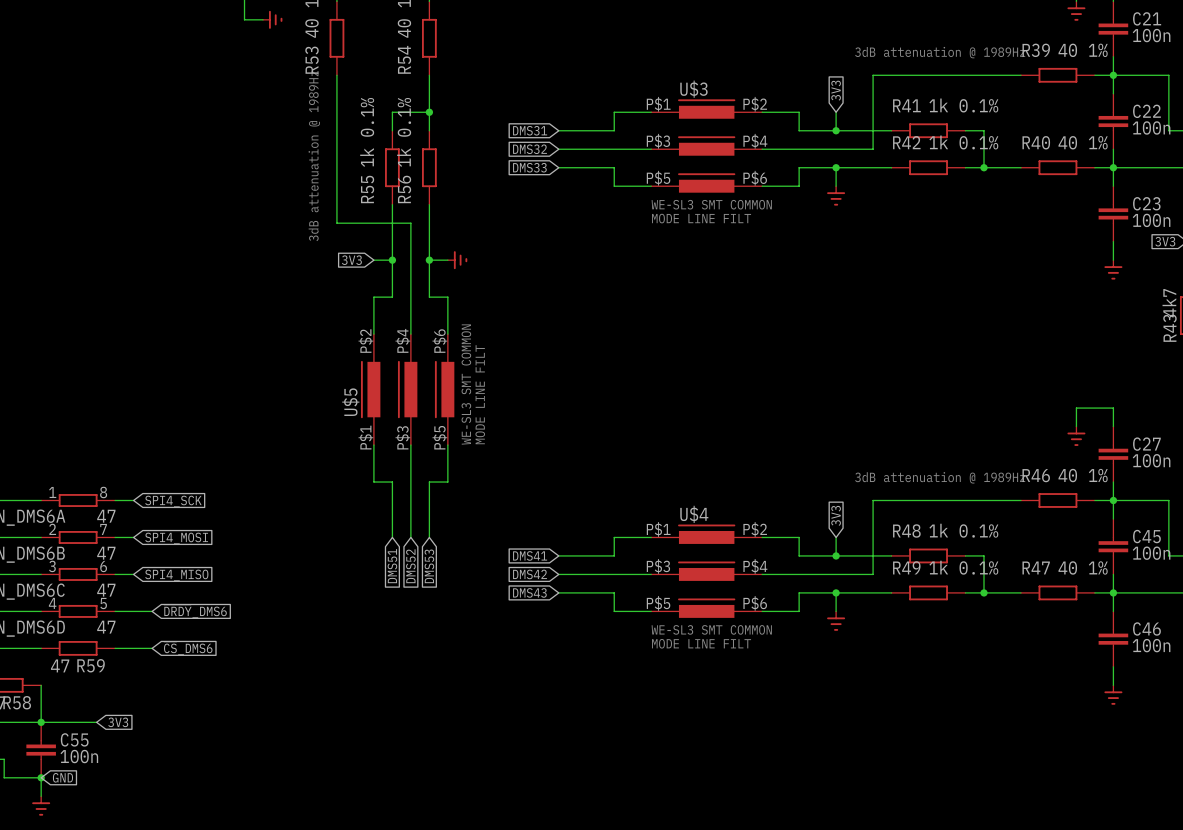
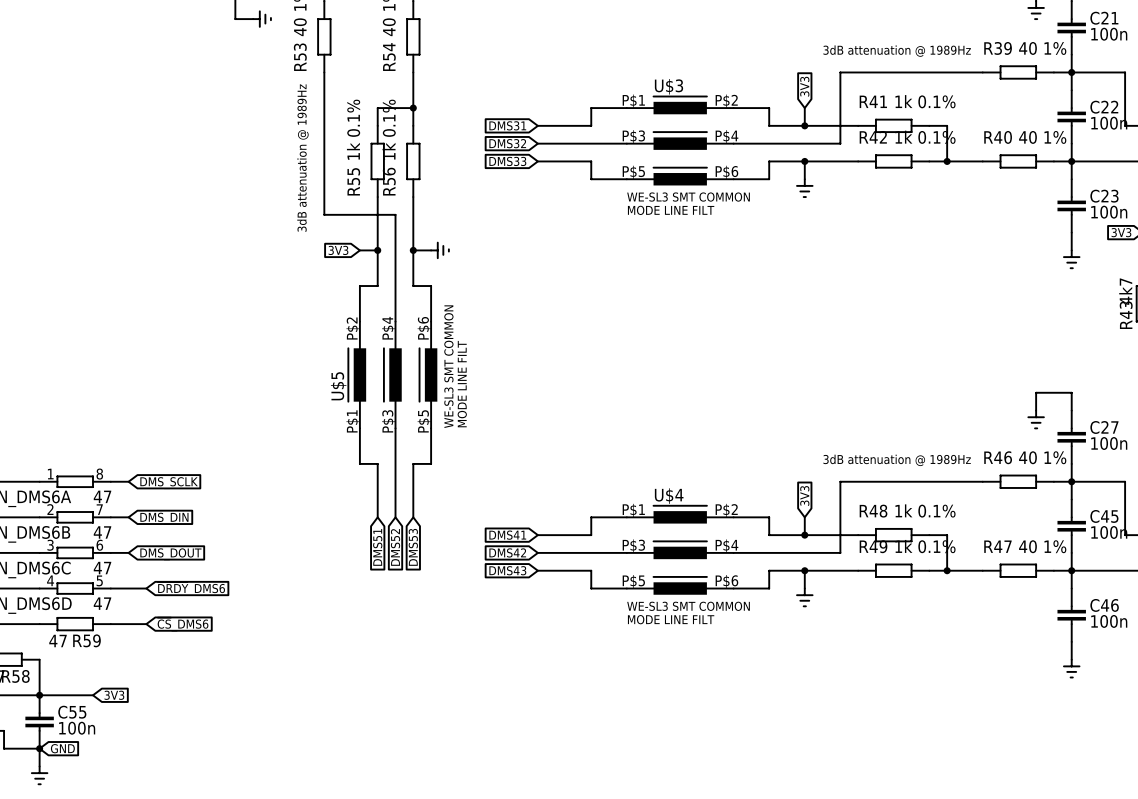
global label: SPI4_SCK (173, 501) -> DMS_SCLK (169, 483)
global label: SPI4_MOSI (176, 538) -> DMS_DIN (164, 518)
global label: SPI4_MISO (176, 575) -> DMS_DOUT (170, 554)

